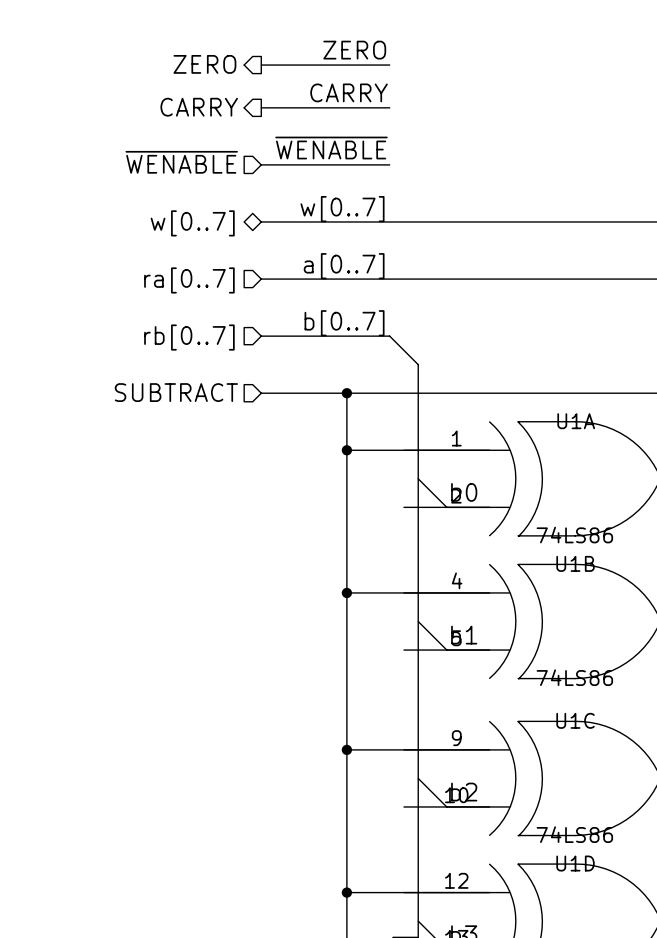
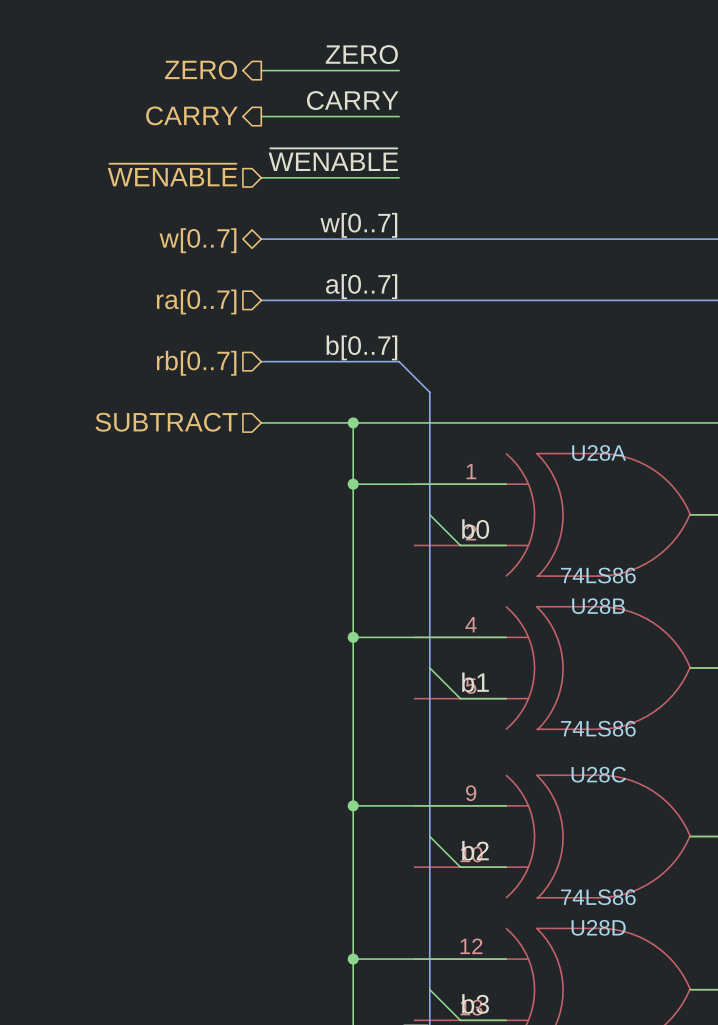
U1A name: U1A (576, 421) -> U28A (599, 452)
U1B name: U1B (575, 563) -> U28B (598, 606)
U1C name: U1C (575, 720) -> U28C (598, 774)
U1D name: U1D (575, 863) -> U28D (598, 927)

